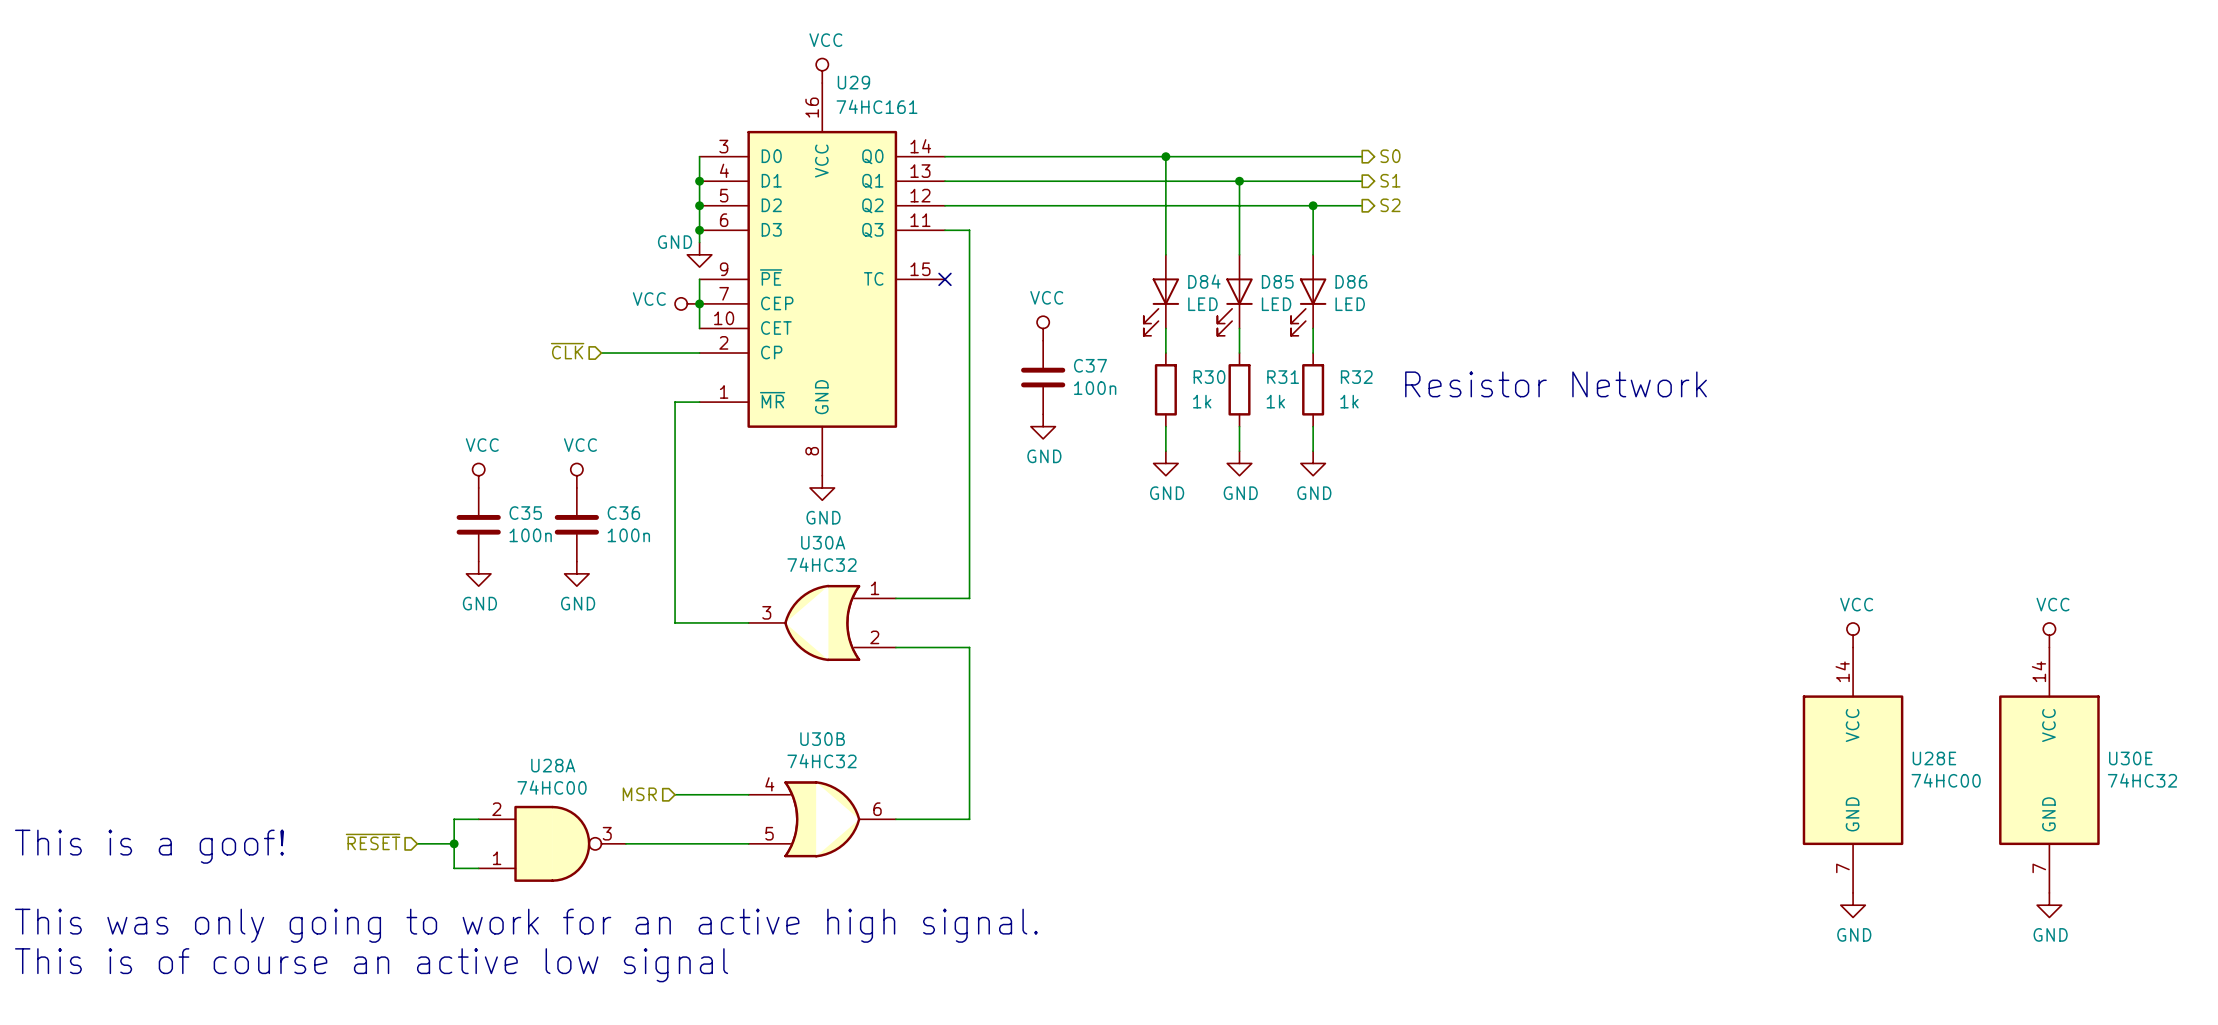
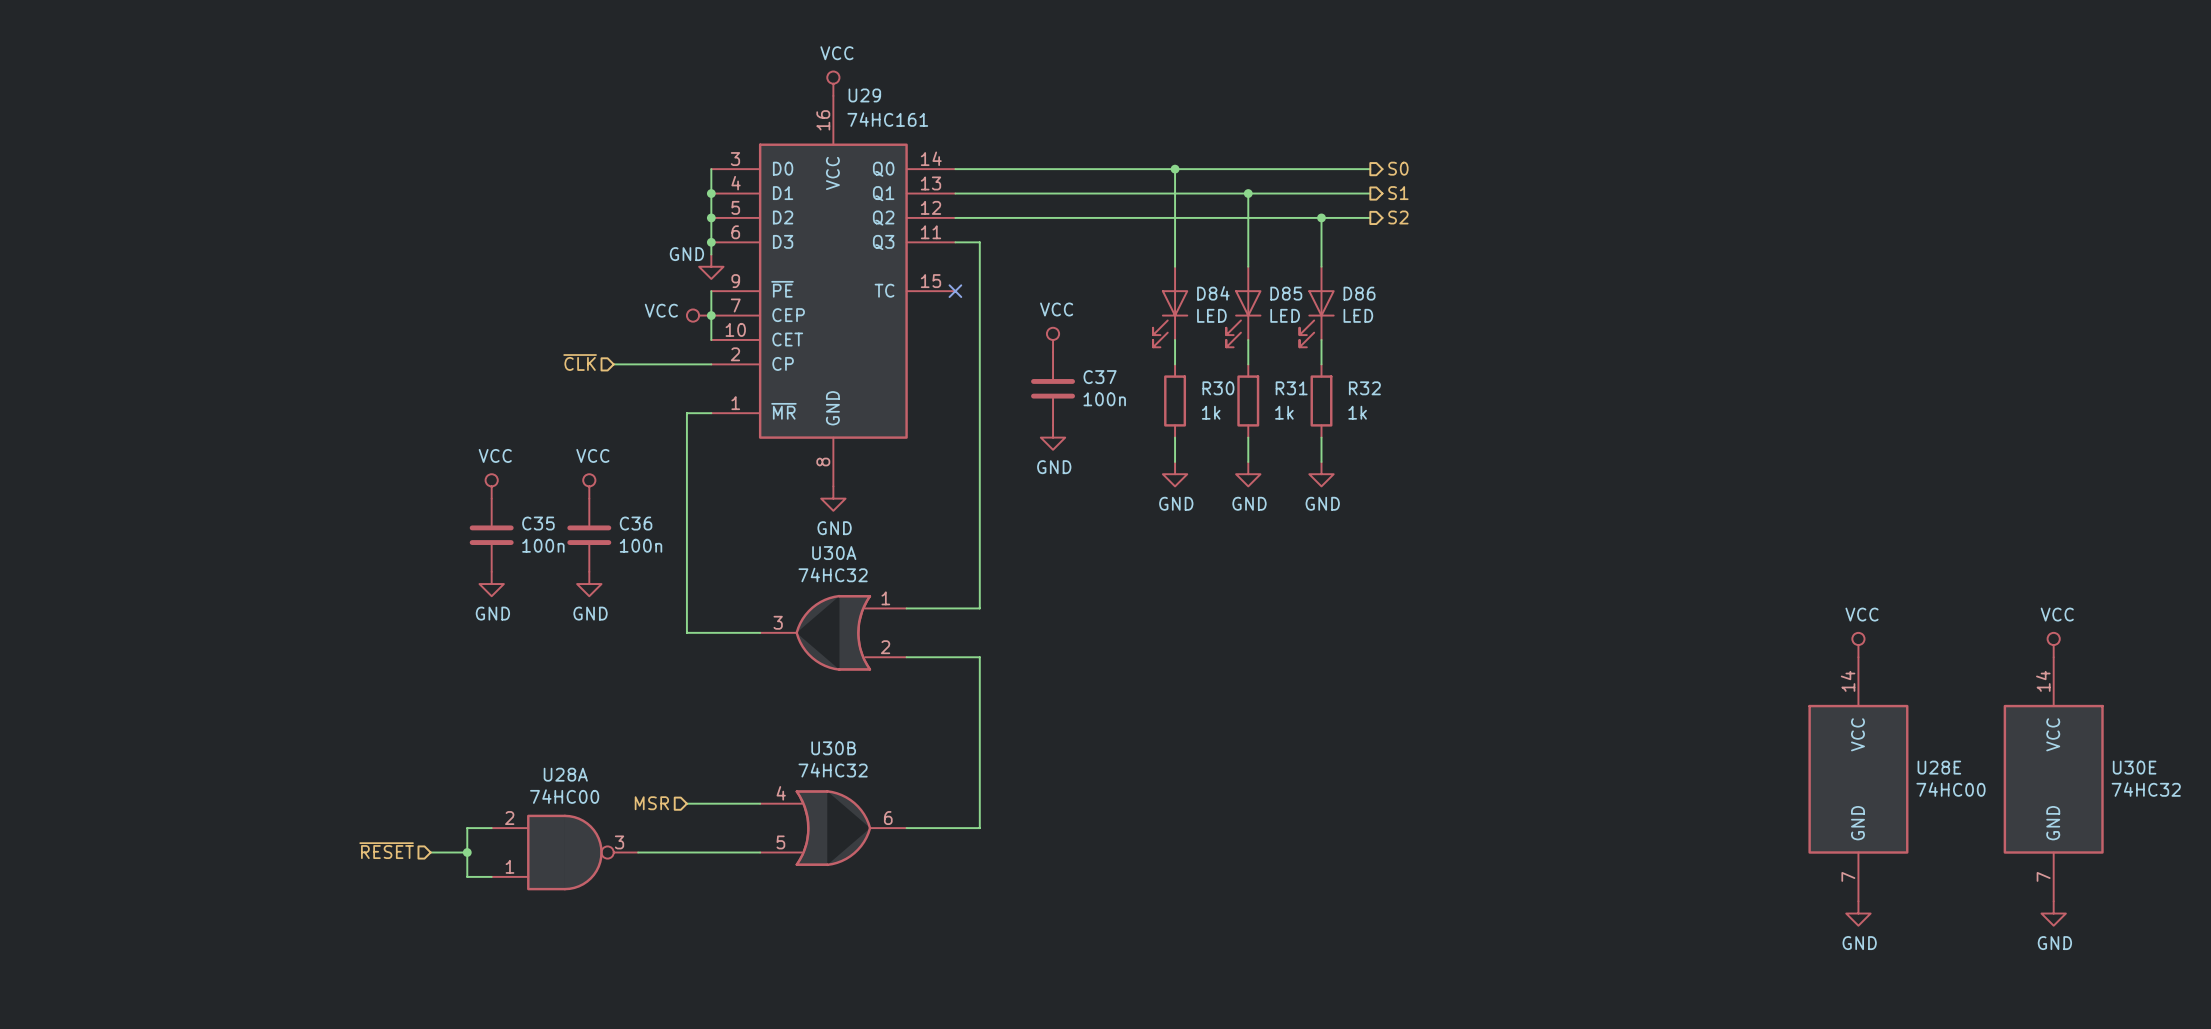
text: Resistor Network (1556, 384) -> none
text: This is a goof! (149, 846) -> none
text: This was only going to work for an active high signal. (526, 925) -> none
text: This is of course an active low signal (371, 965) -> none

